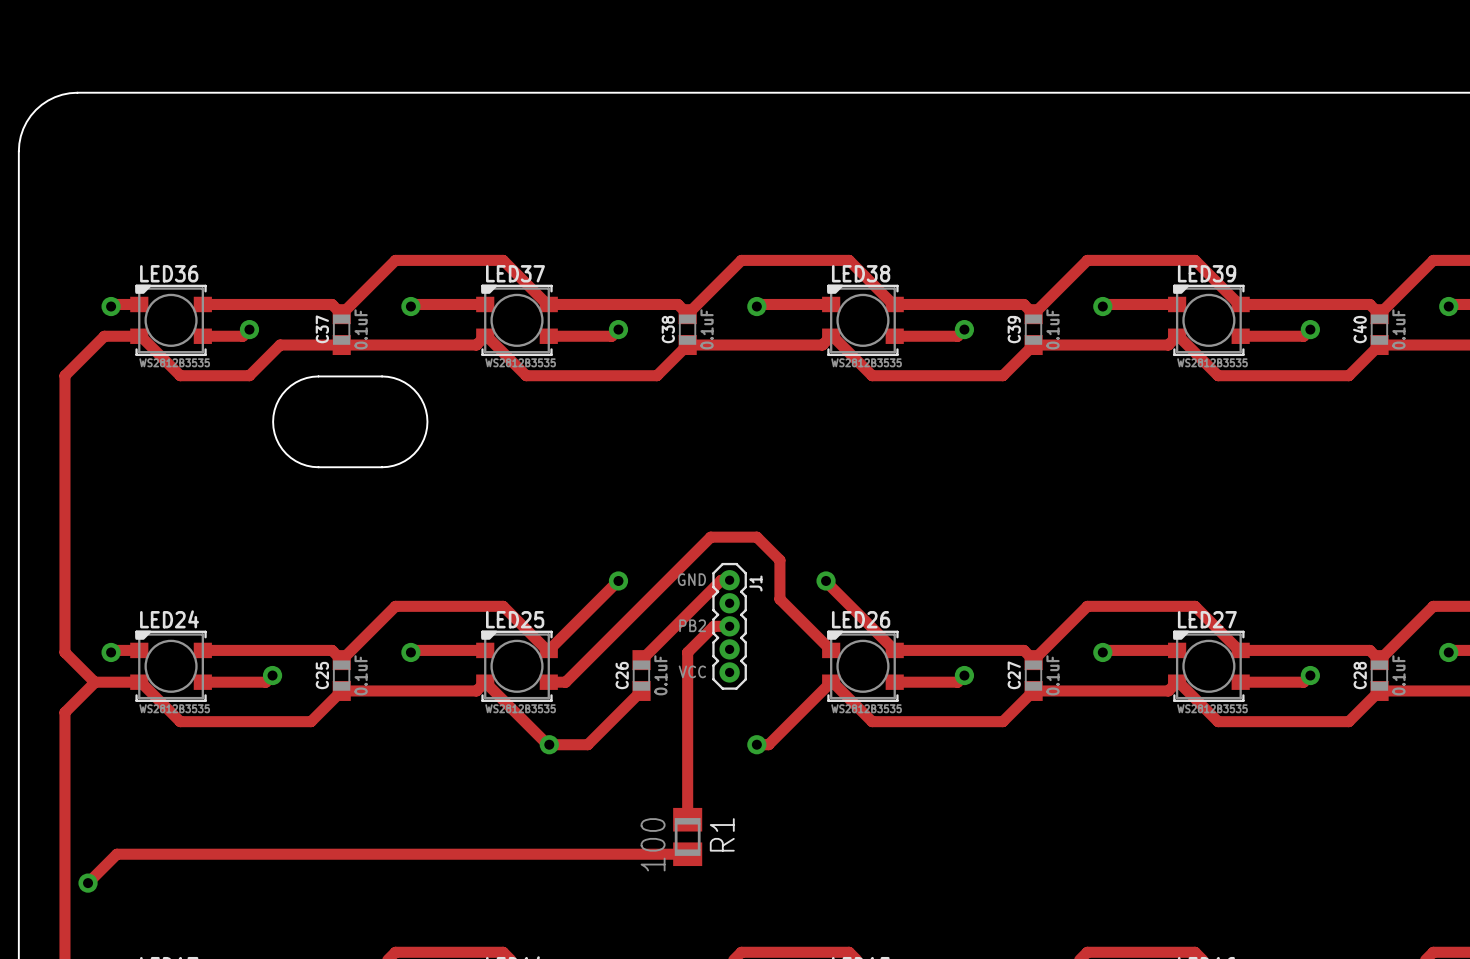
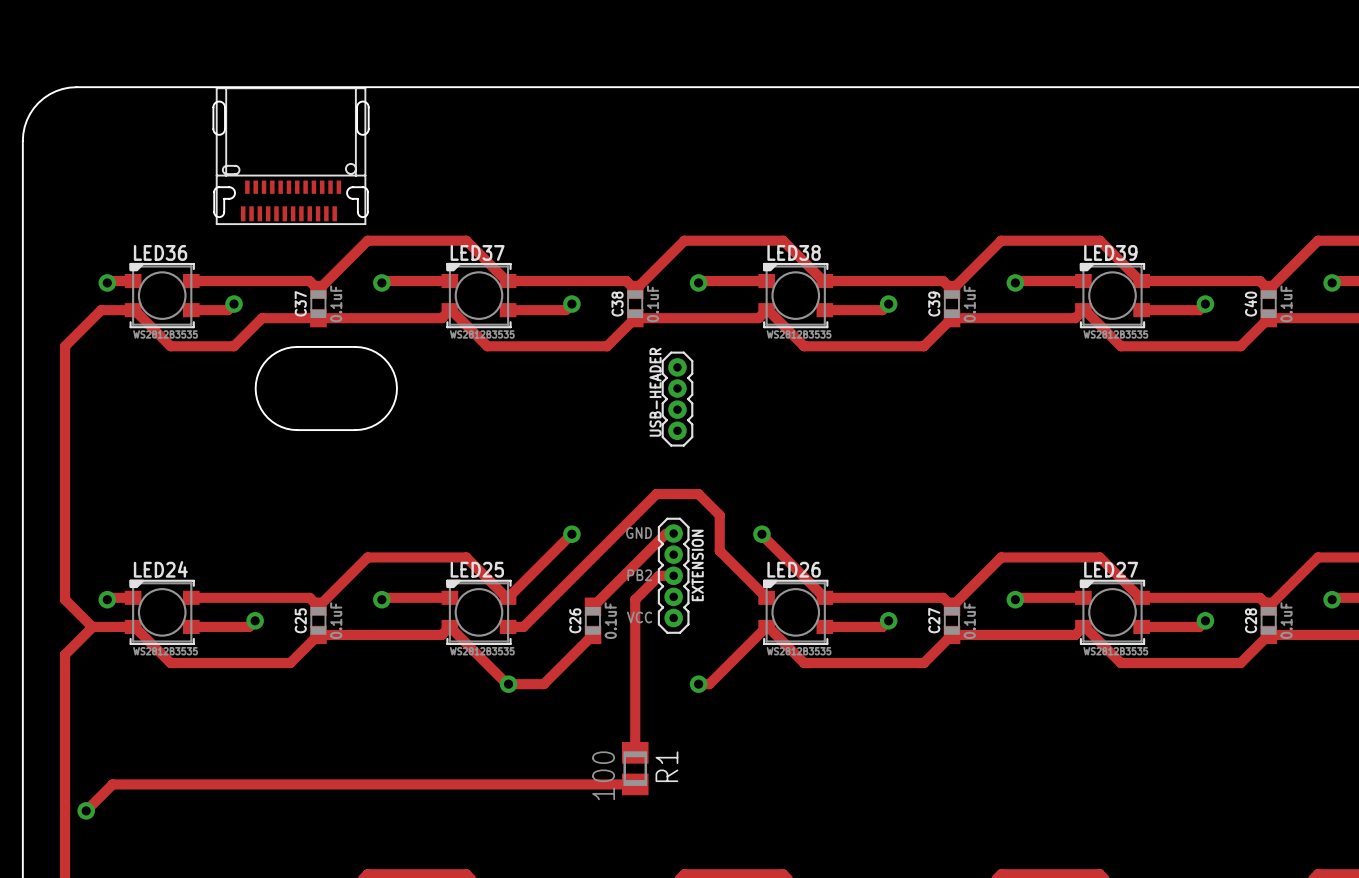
part: none -> (291, 156)
USB-HEADER: none -> (677, 399)
J1 name: J1 (755, 583) -> EXTENSION (697, 565)

